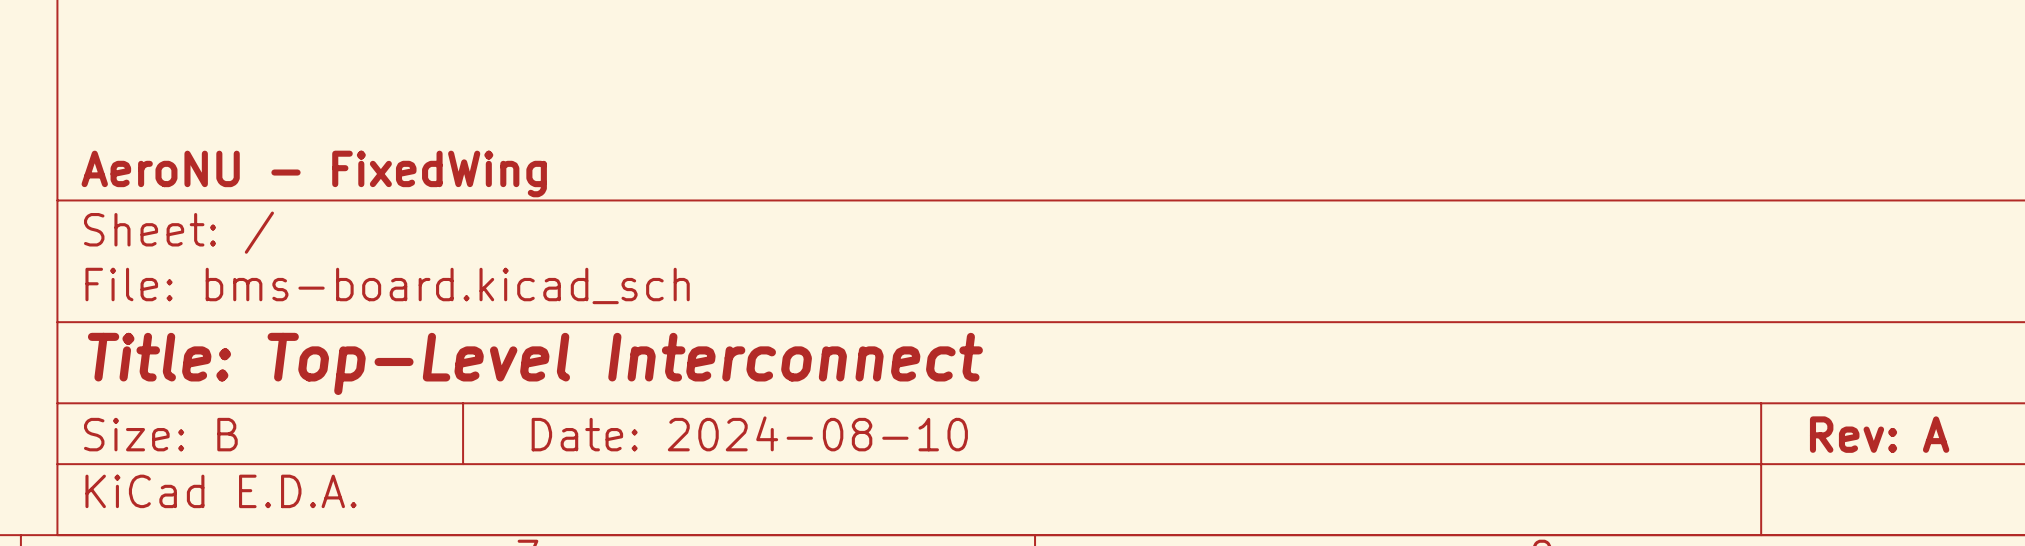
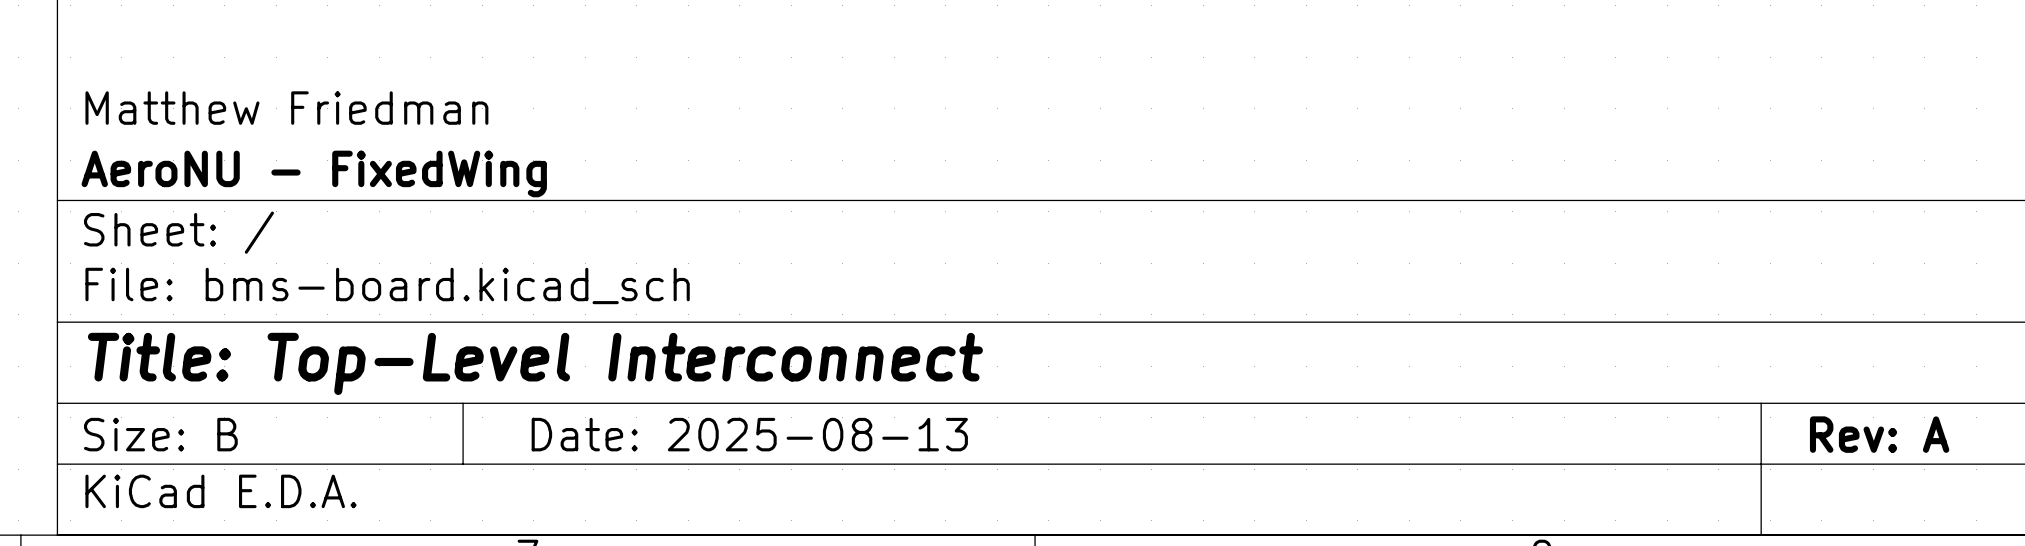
title block: none -> Matthew Friedman (286, 108)
title block: Date: 2024-08-10 (749, 433) -> Date: 2025-08-13 (749, 434)

